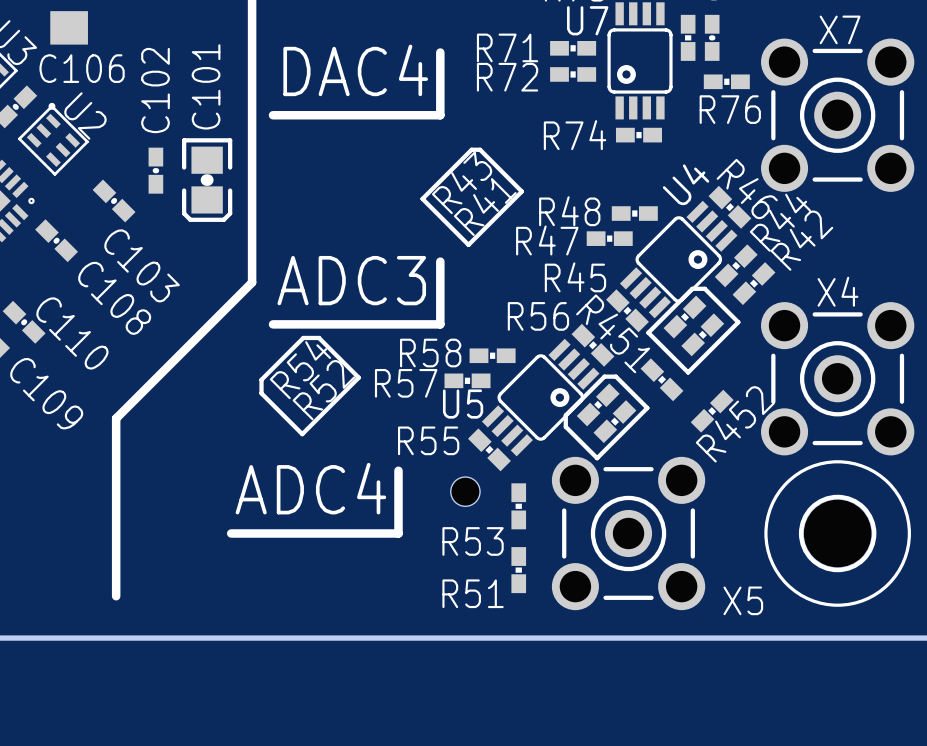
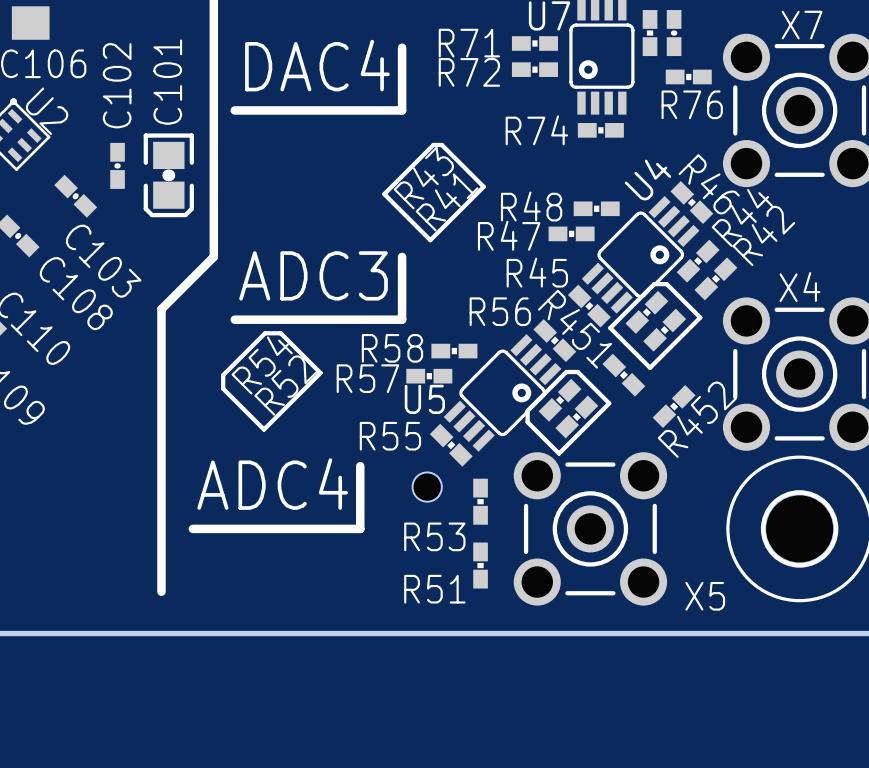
line: (252, 261) (252, 282) (116, 418) (116, 596) -> (213, 256) (161, 309) (161, 591)

